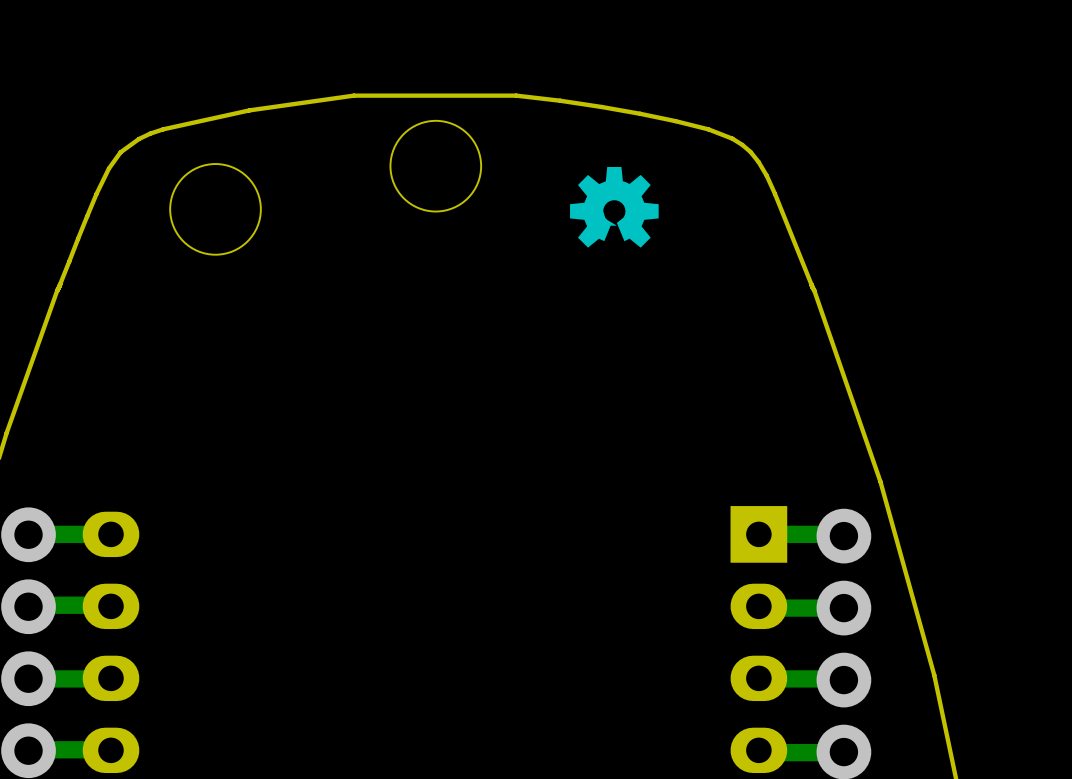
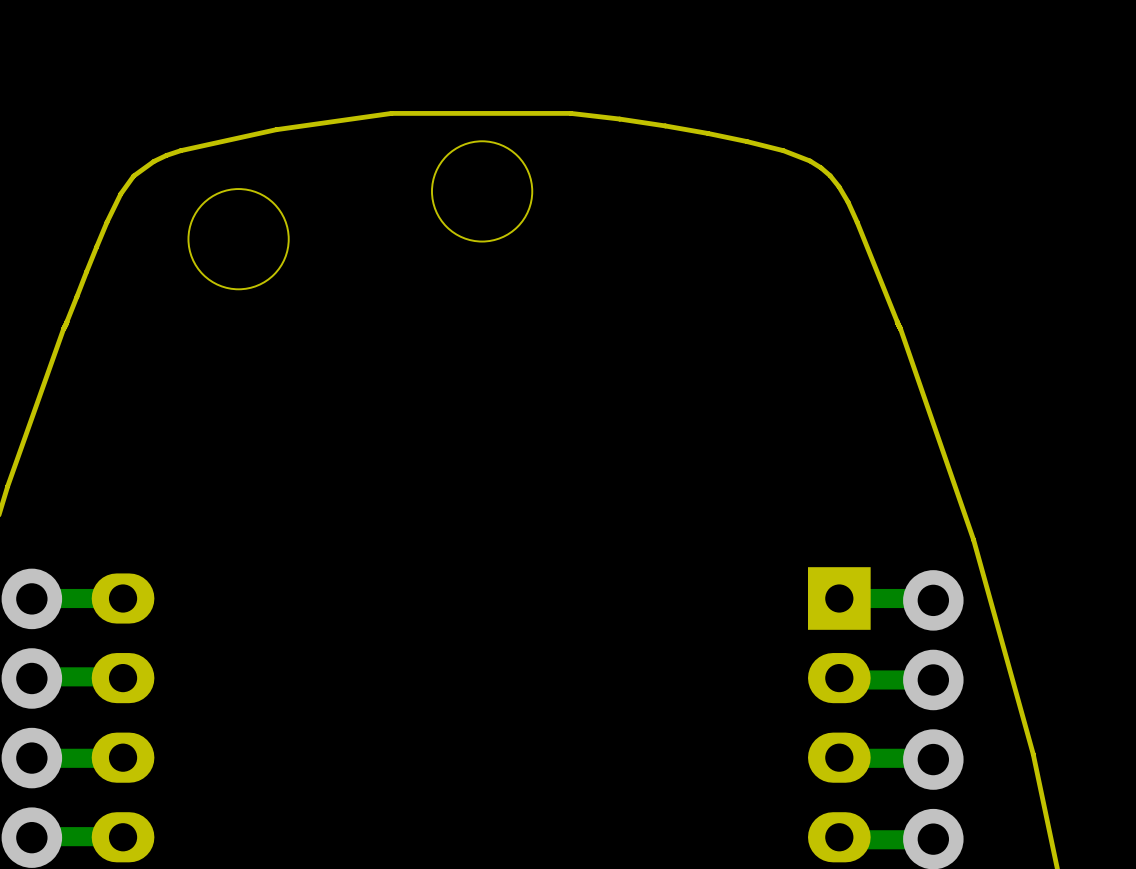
drawing: [570, 166, 659, 248] -> none

